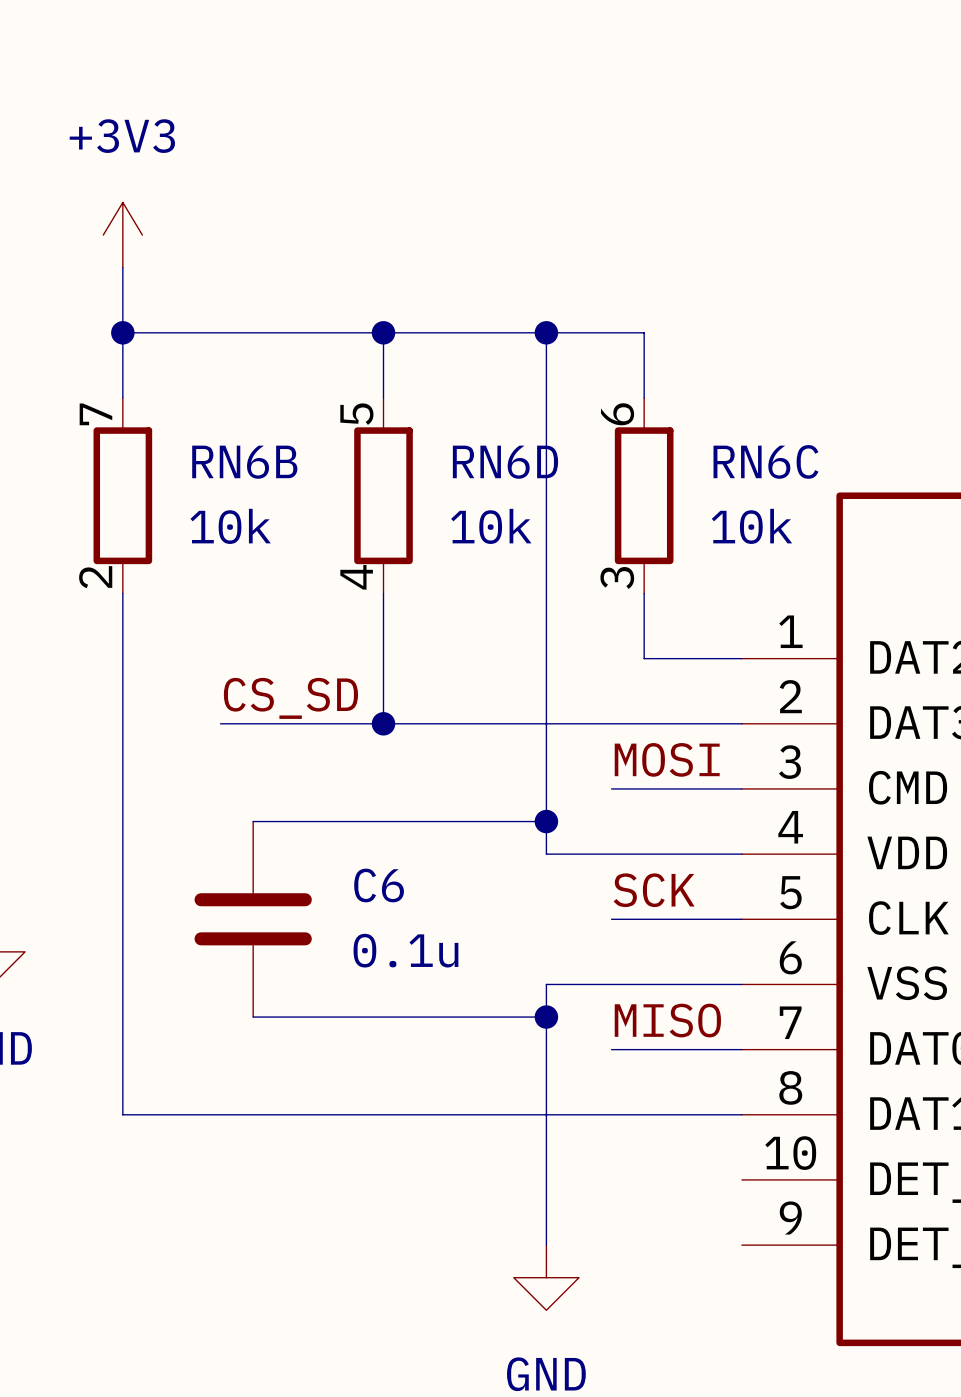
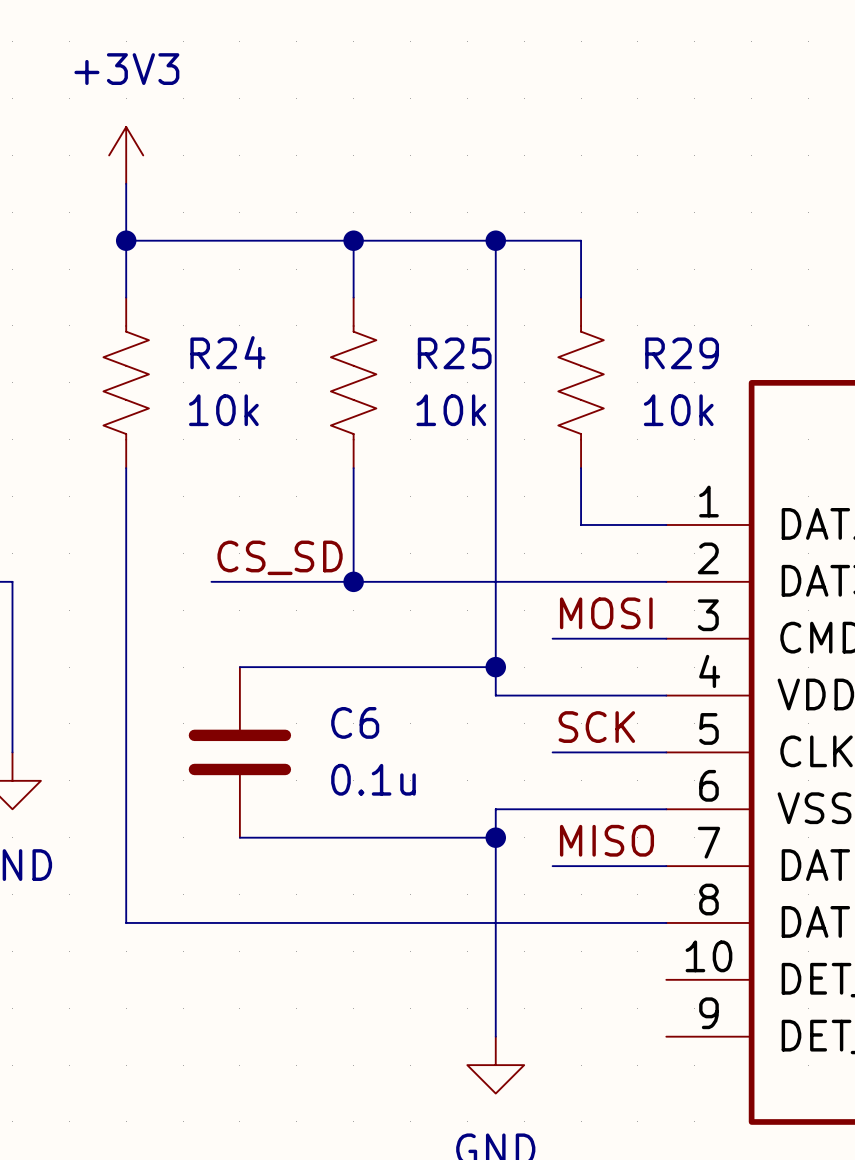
RN6B: 10k (122, 495) -> none
R24: none -> 10k (126, 382)
RN6D: 10k (383, 495) -> none
R25: none -> 10k (353, 382)
RN6C: 10k (644, 495) -> none
R29: none -> 10k (581, 382)

